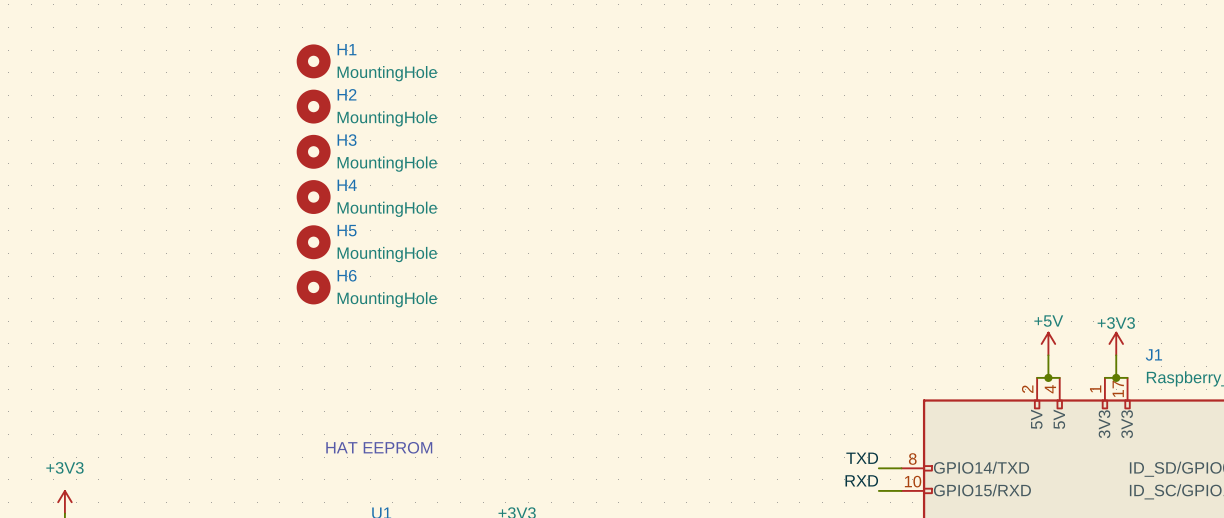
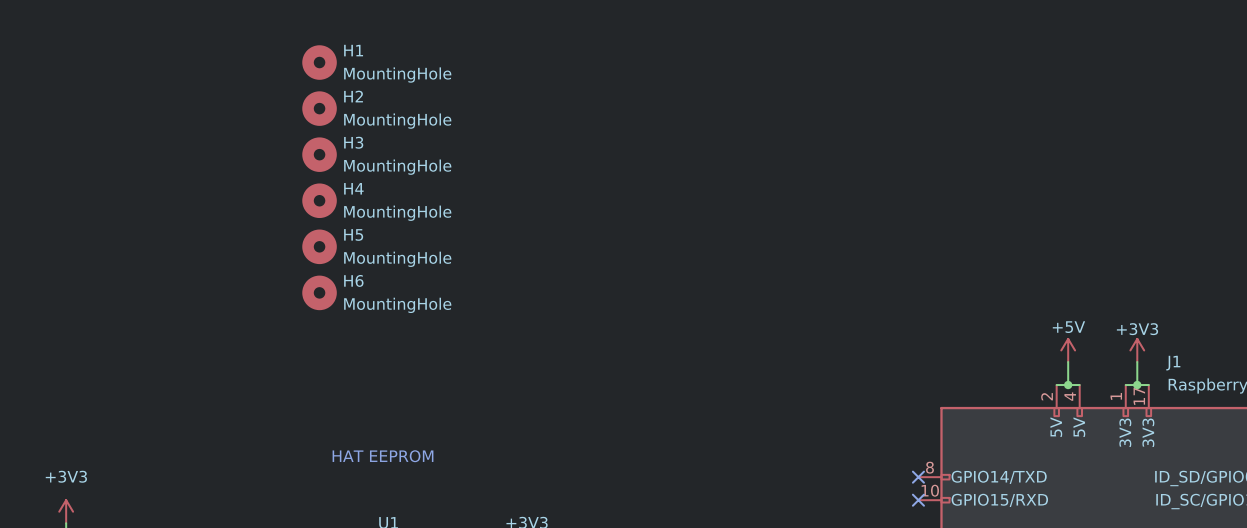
label: TXD (862, 458) -> none
wire: (878, 468) (901, 468) -> none
no-connect mark: none -> (918, 477)
label: RXD (861, 480) -> none
wire: (878, 490) (901, 490) -> none
no-connect mark: none -> (918, 500)

